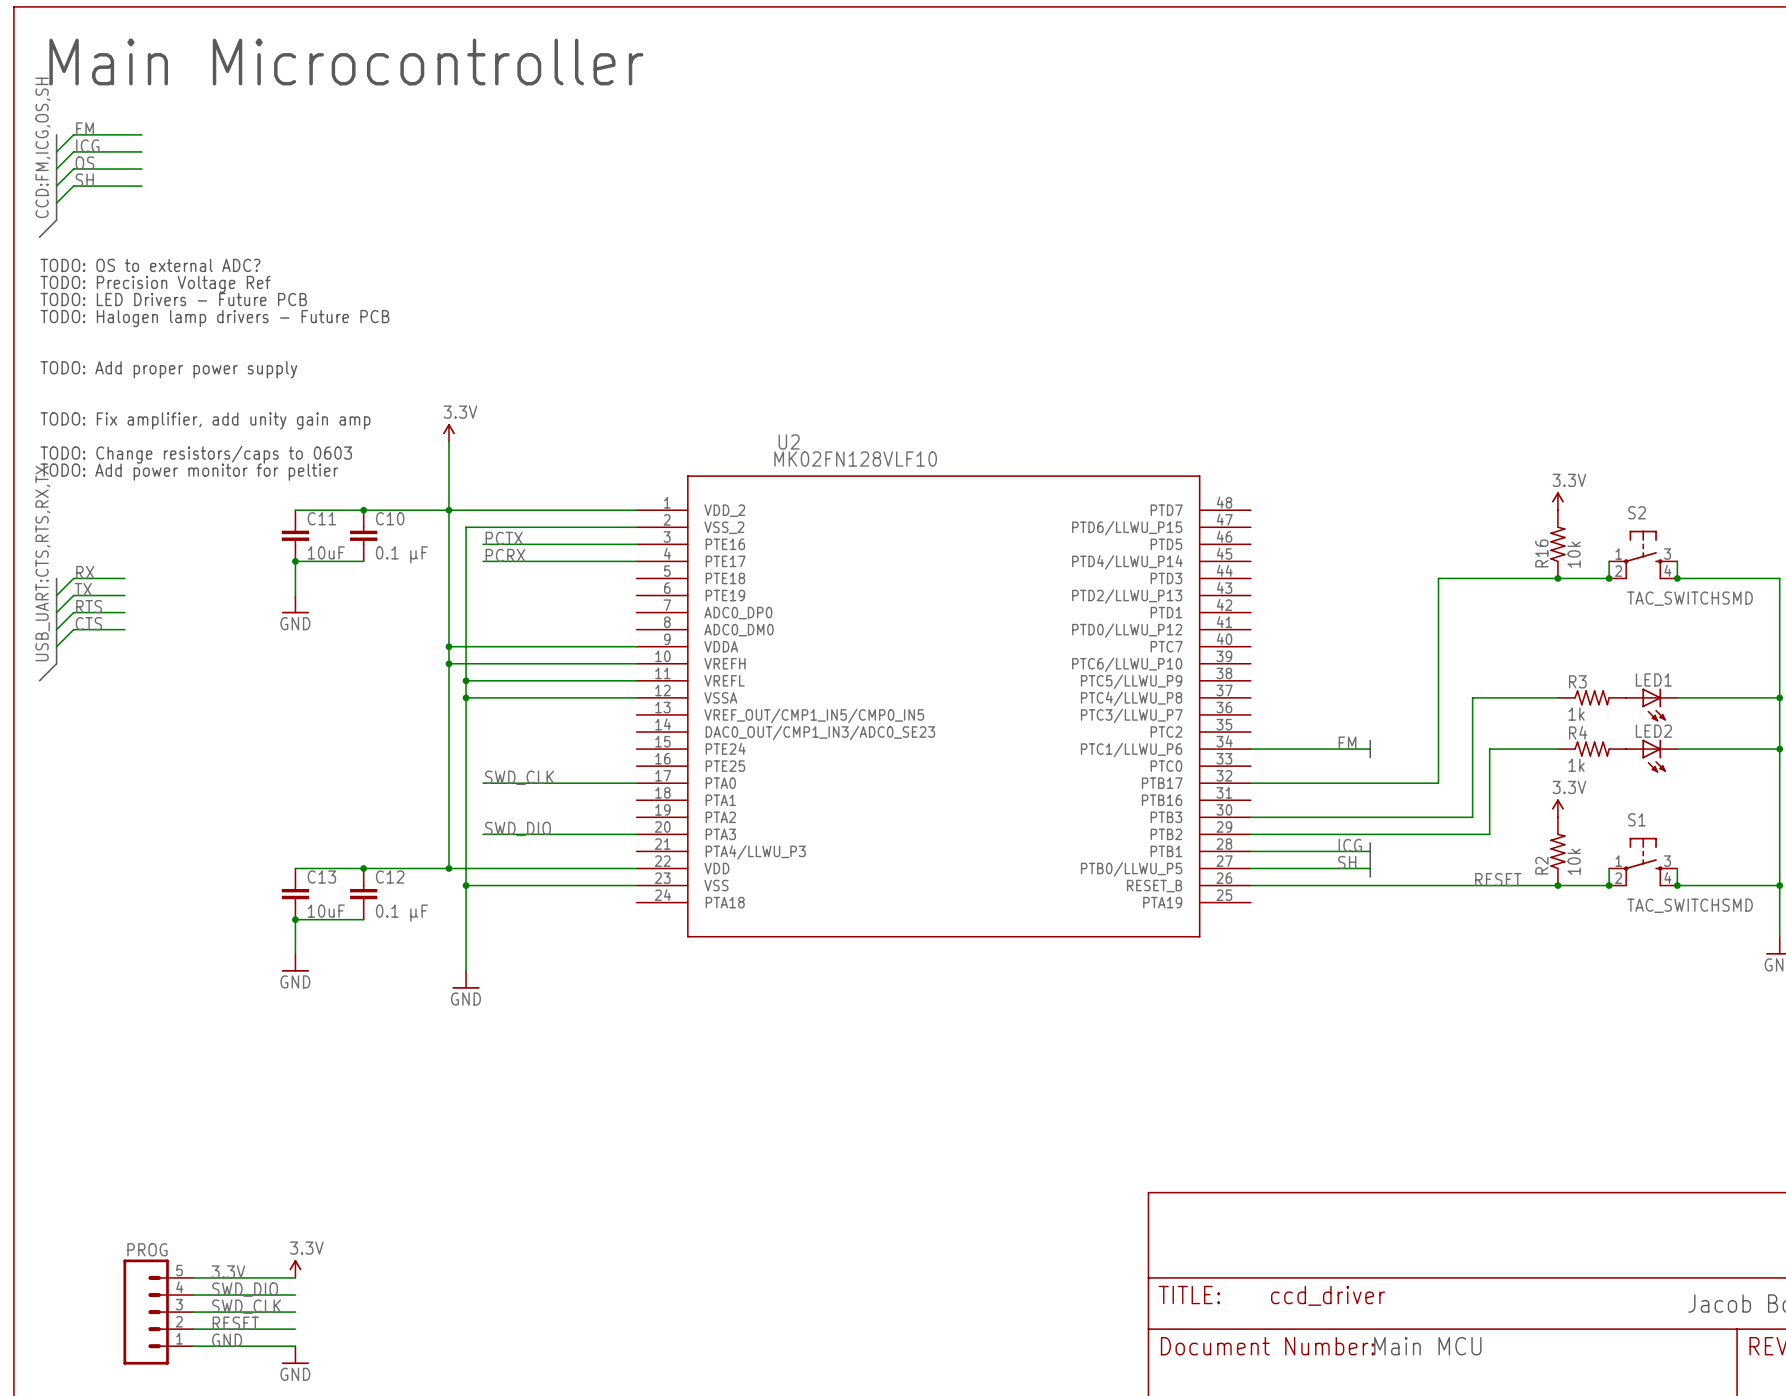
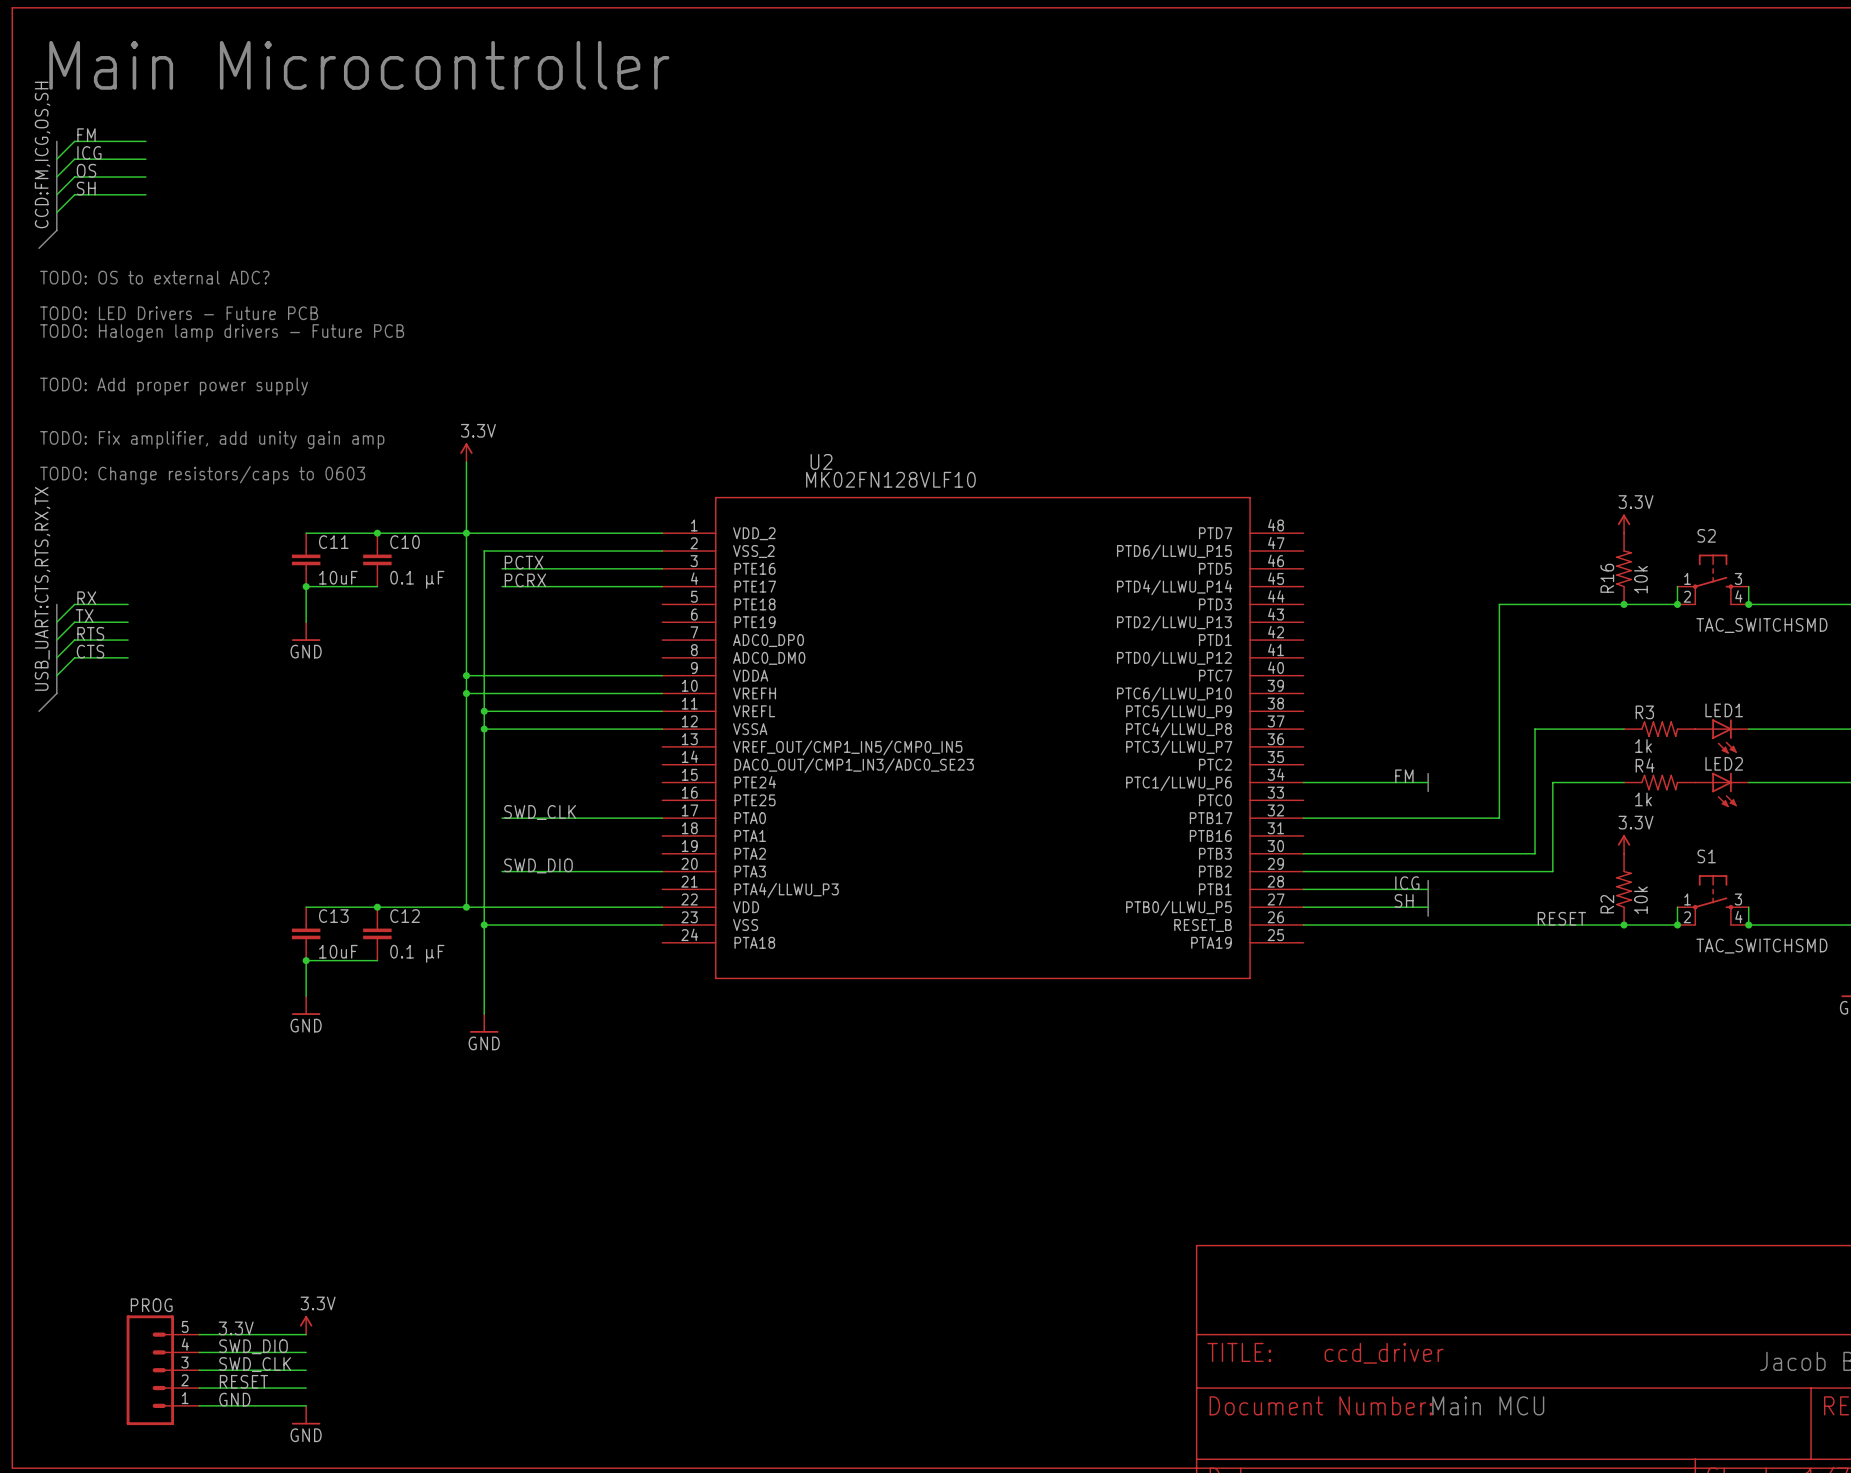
text: TODO: Precision Voltage Ref (155, 284) -> none
text: TODO: Add power monitor for peltier (189, 472) -> none

